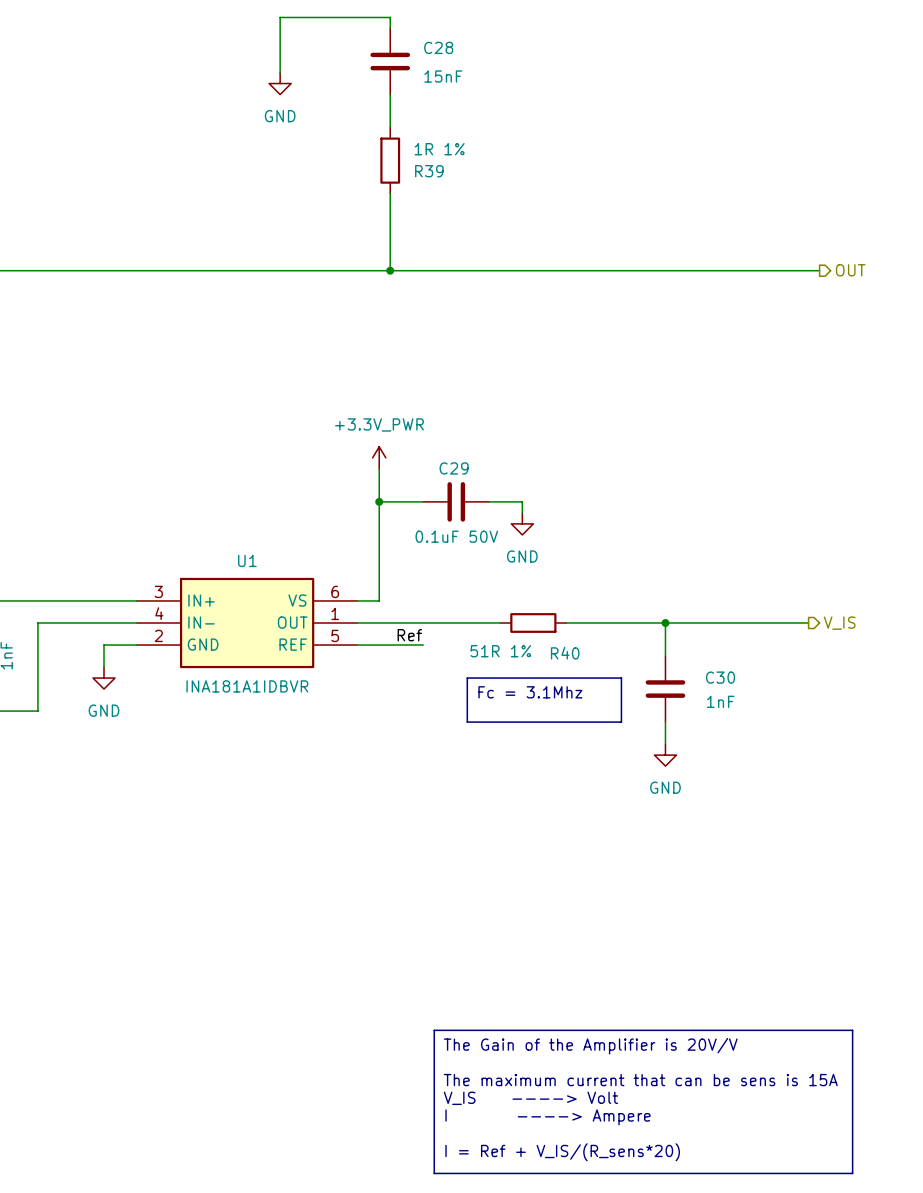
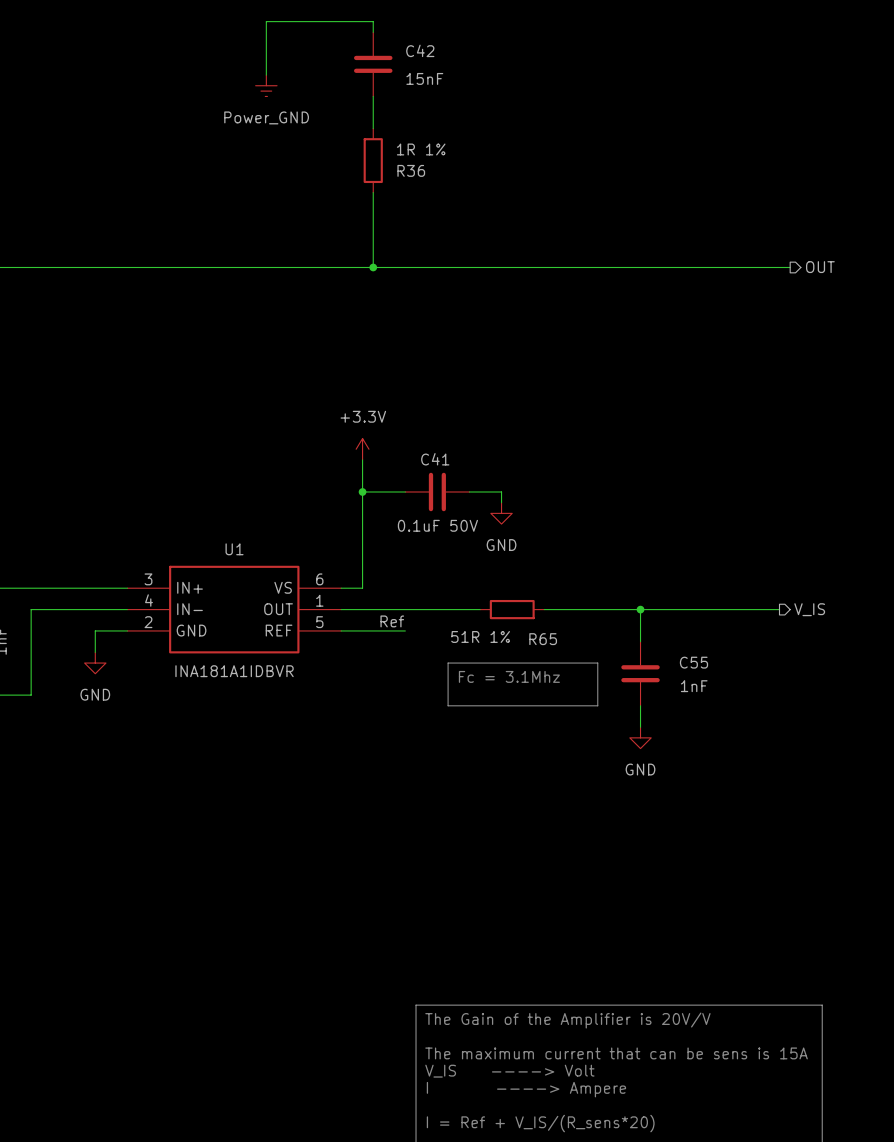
C28 name: C28 (438, 47) -> C42 (420, 50)
power symbol: GND (280, 83) -> Power_GND (266, 85)
R39 name: R39 (429, 171) -> R36 (411, 170)
power symbol: +3.3V_PWR (379, 457) -> +3.3V (362, 449)
C29 name: C29 (454, 468) -> C41 (435, 459)
R40 name: R40 (565, 653) -> R65 (543, 639)
C30 name: C30 (720, 677) -> C55 (693, 662)

